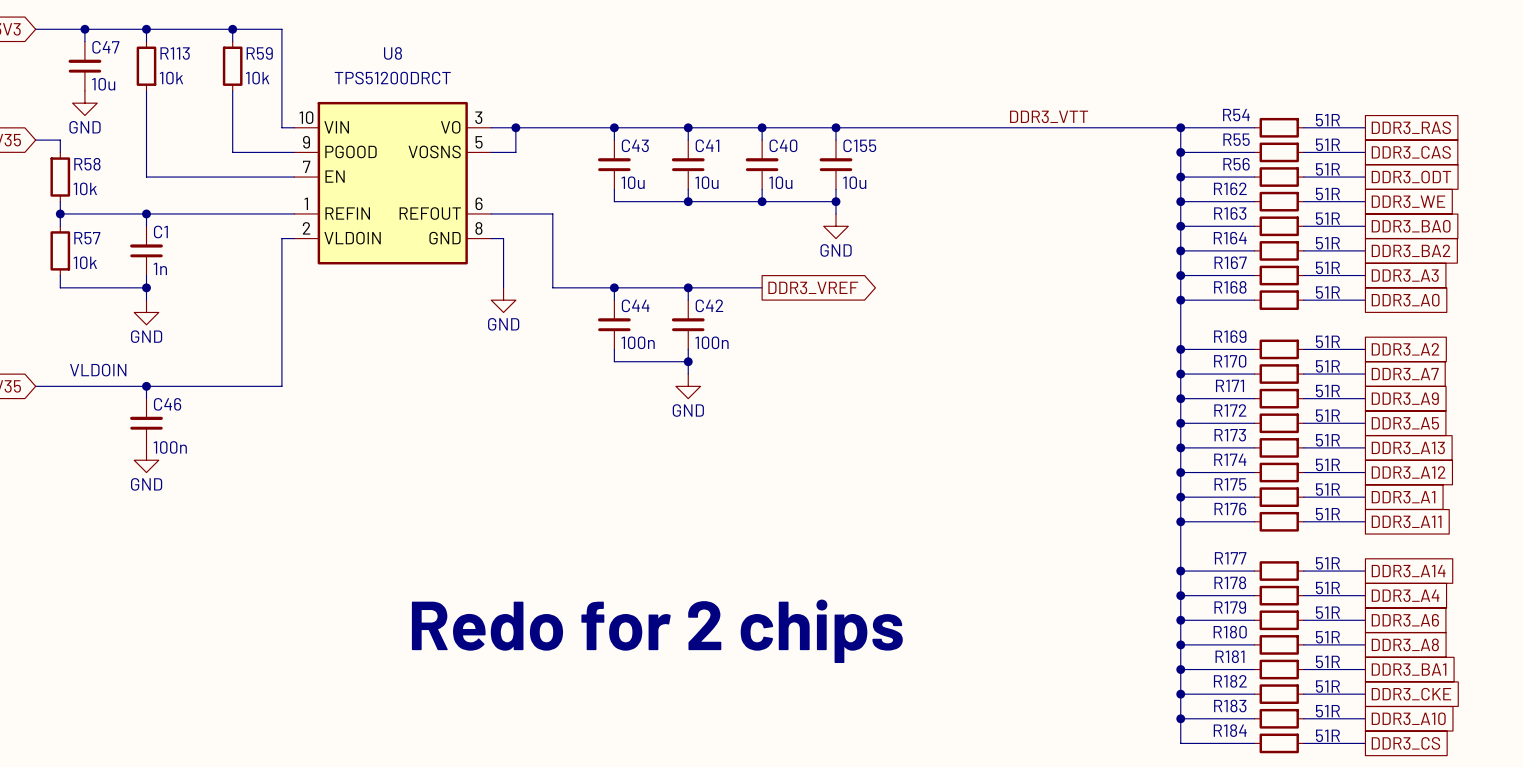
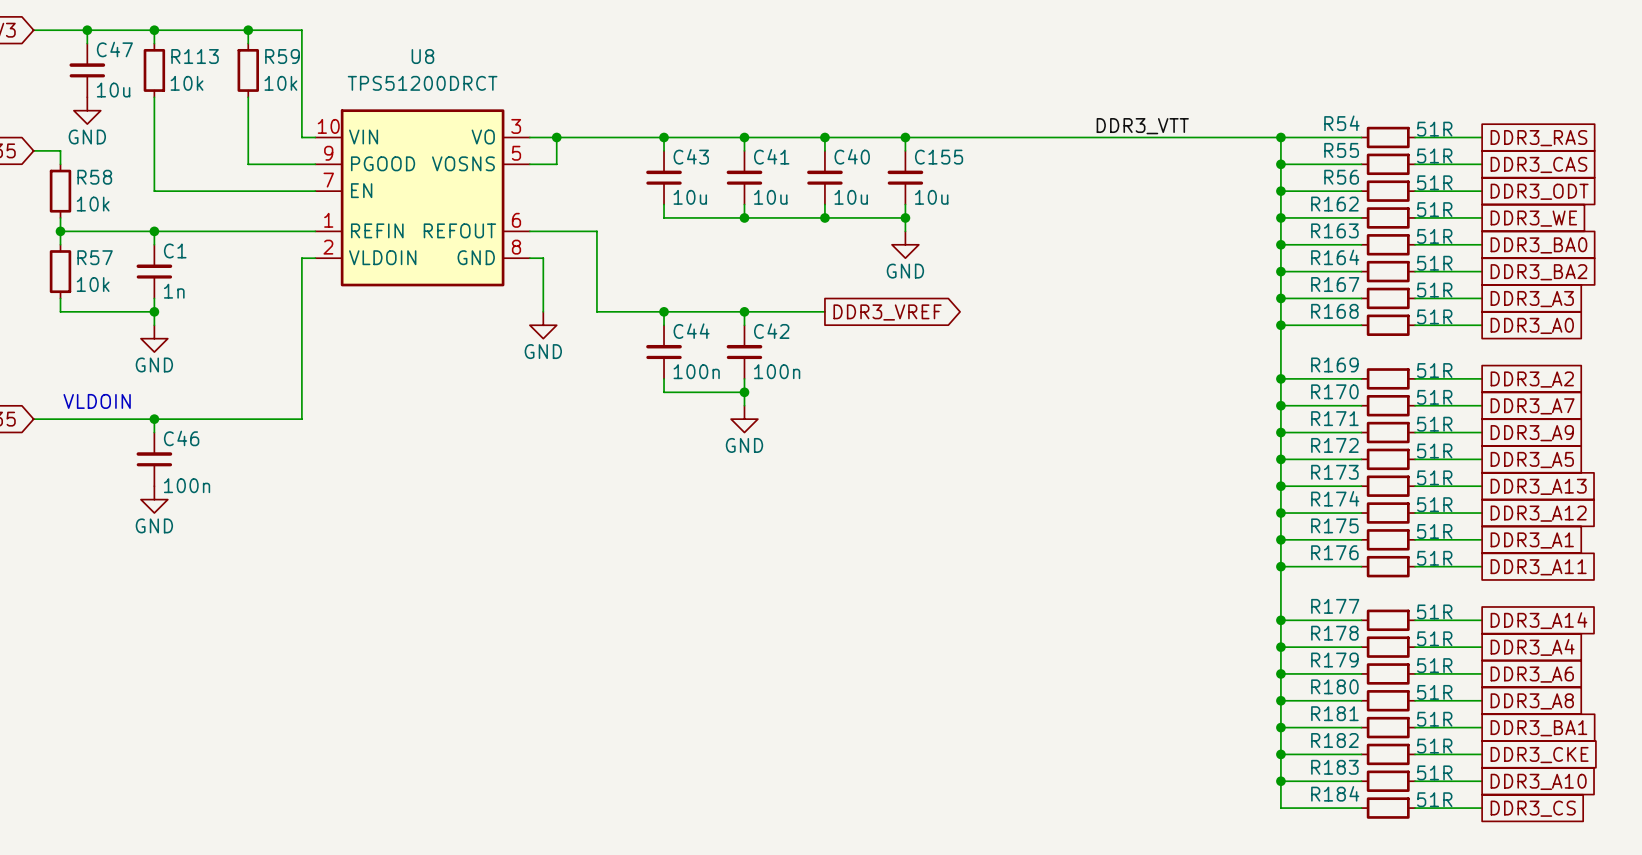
text: Redo for 2 chips (657, 631) -> none

